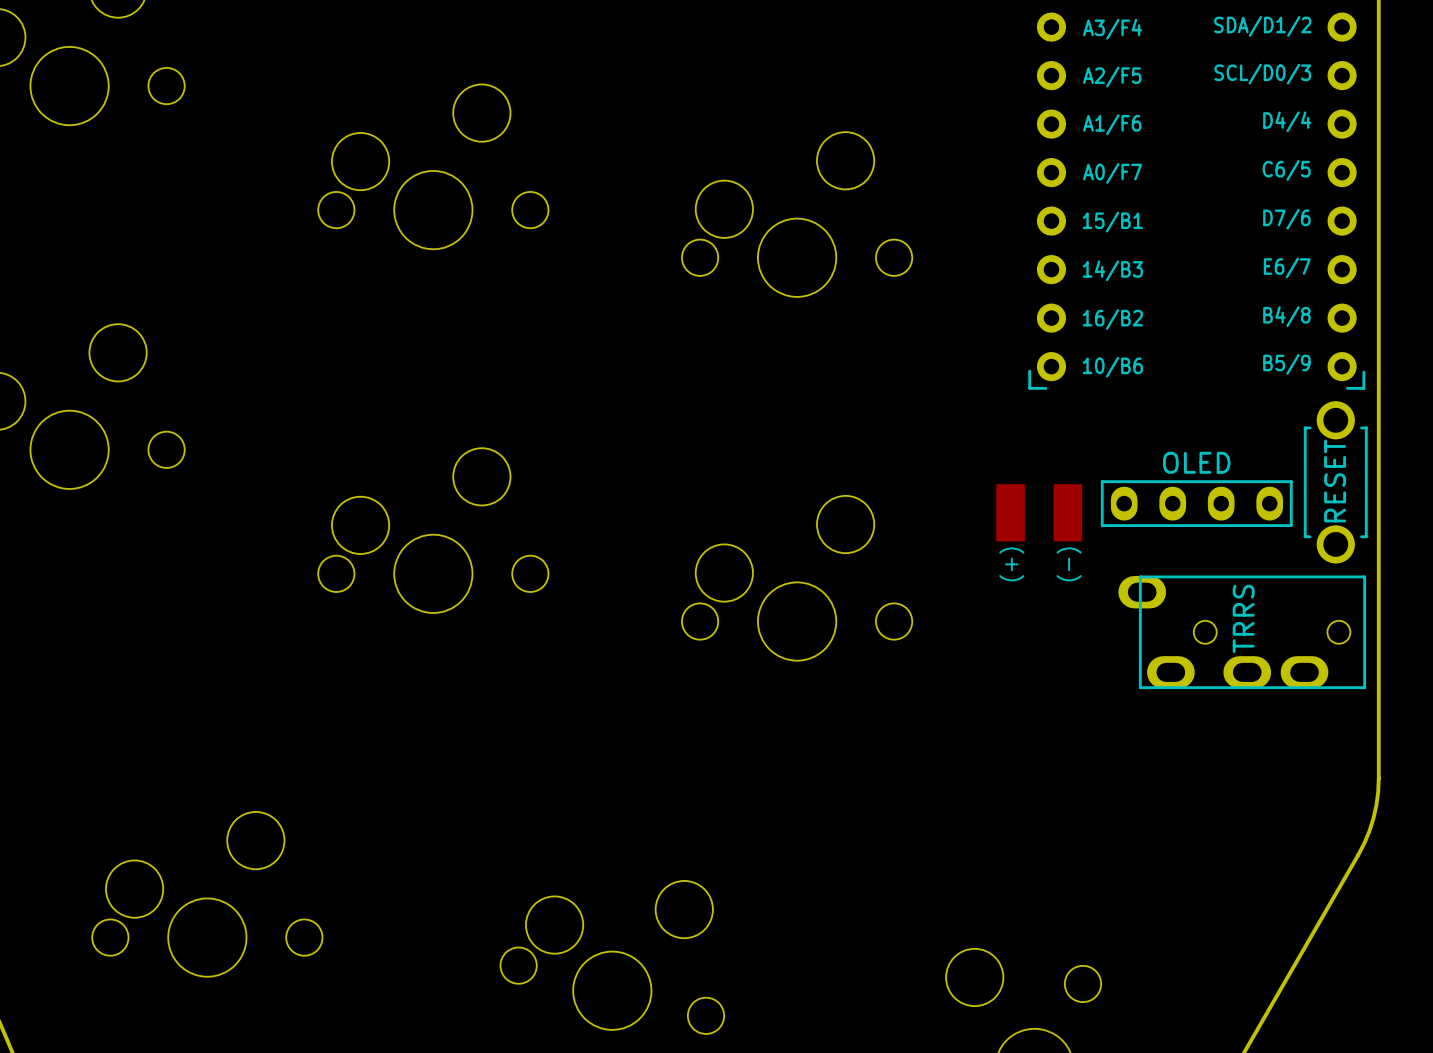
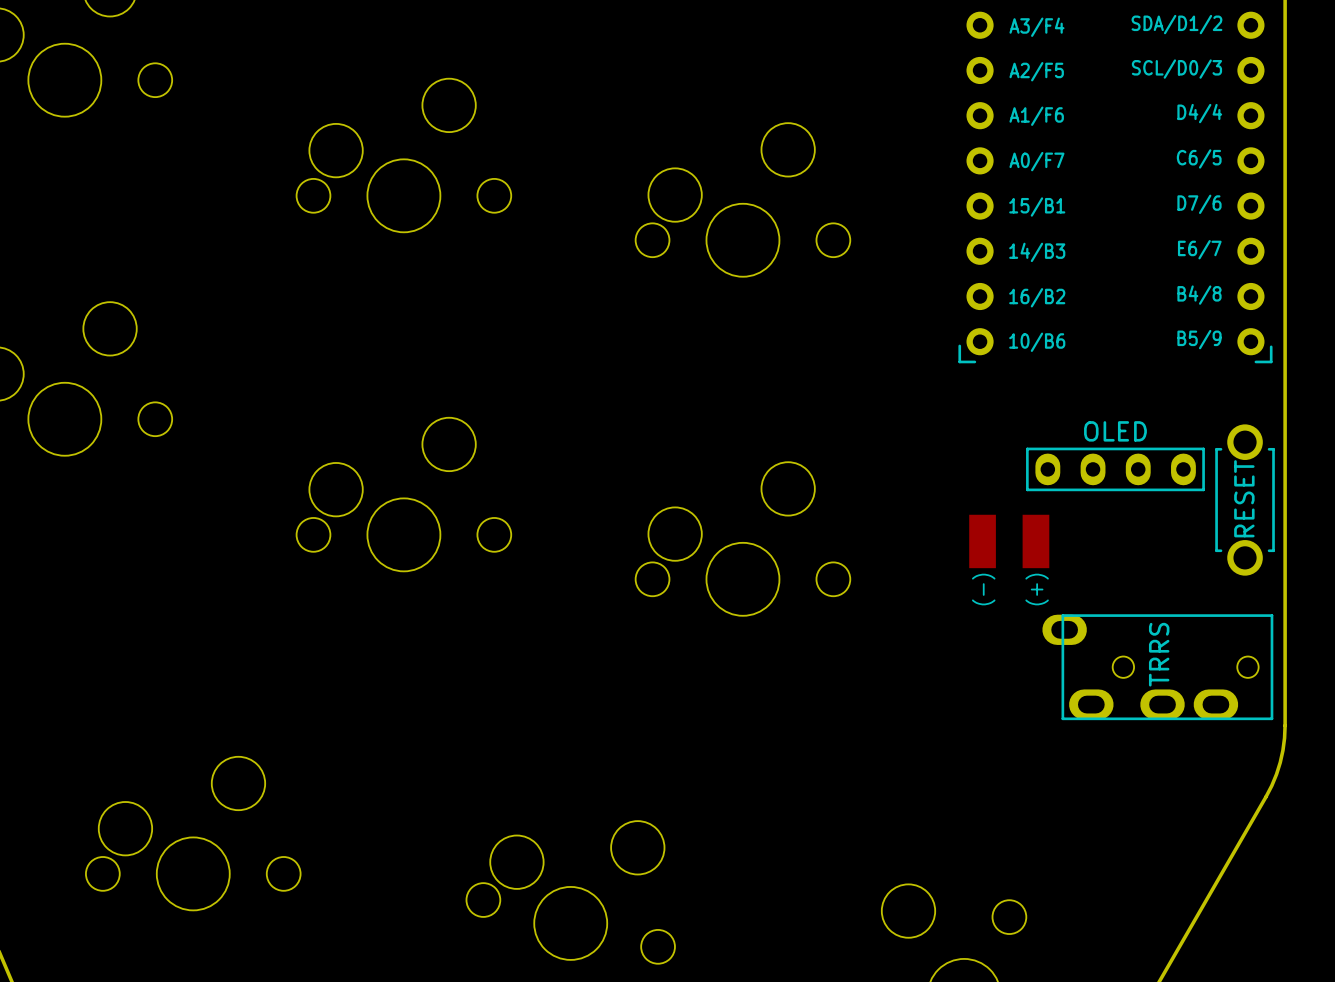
part position: (1335, 482) -> (1245, 500)
part side: bottom (1039, 512) -> top (1009, 541)
part position: (1242, 632) -> (1157, 667)

